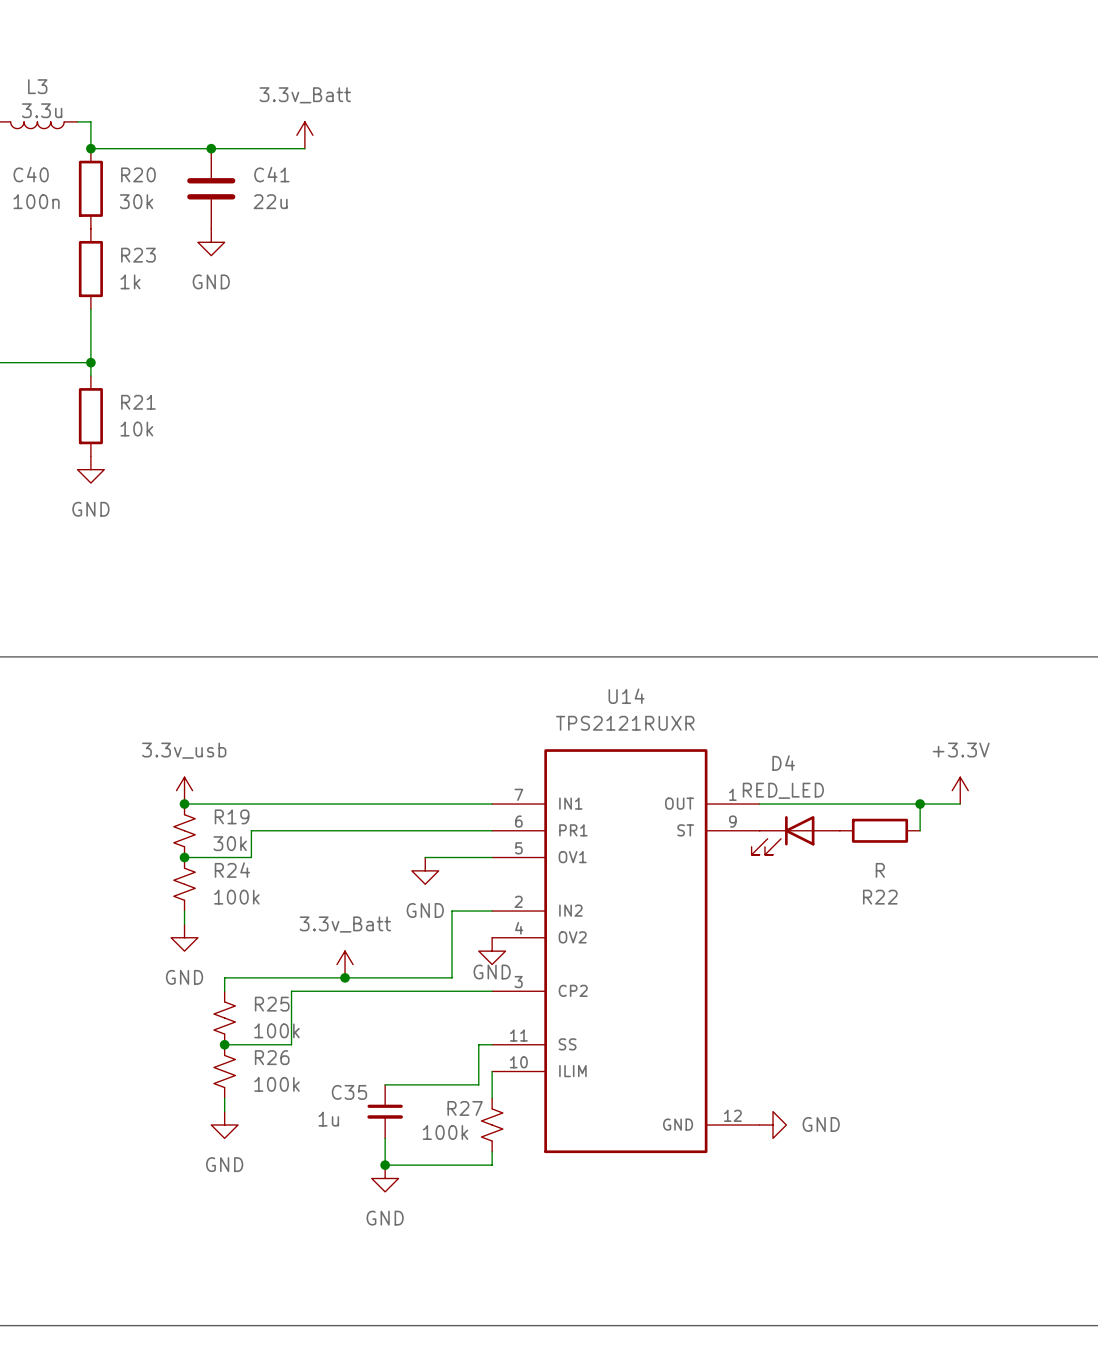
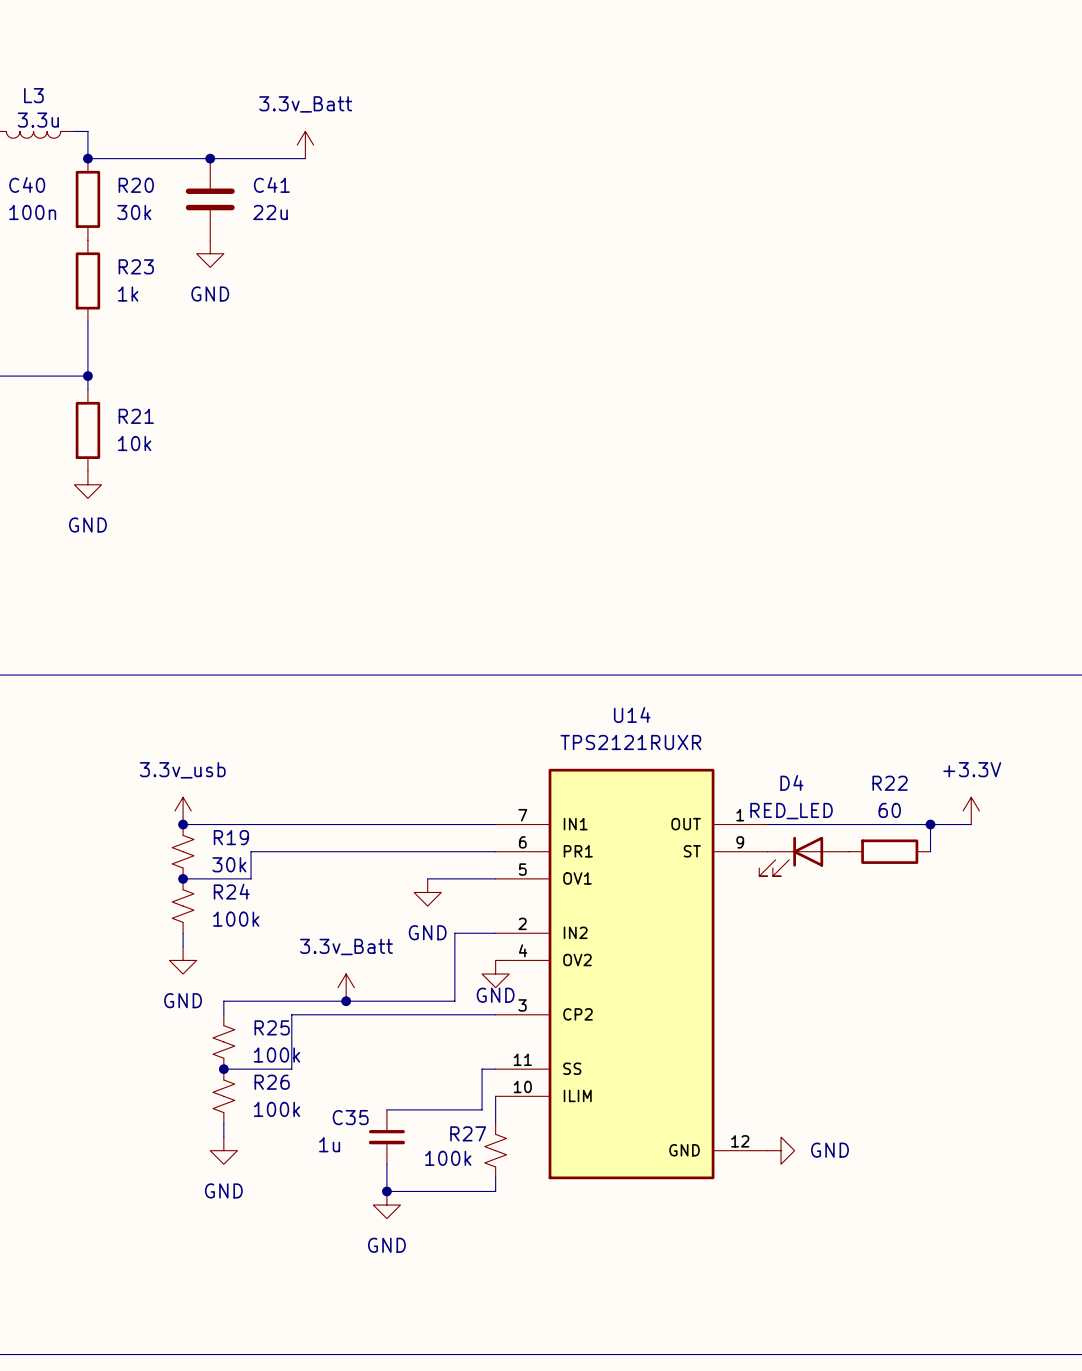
R22 value: R (880, 870) -> 60 (889, 810)
R22 name position: R22 (880, 897) -> R22 (890, 783)

